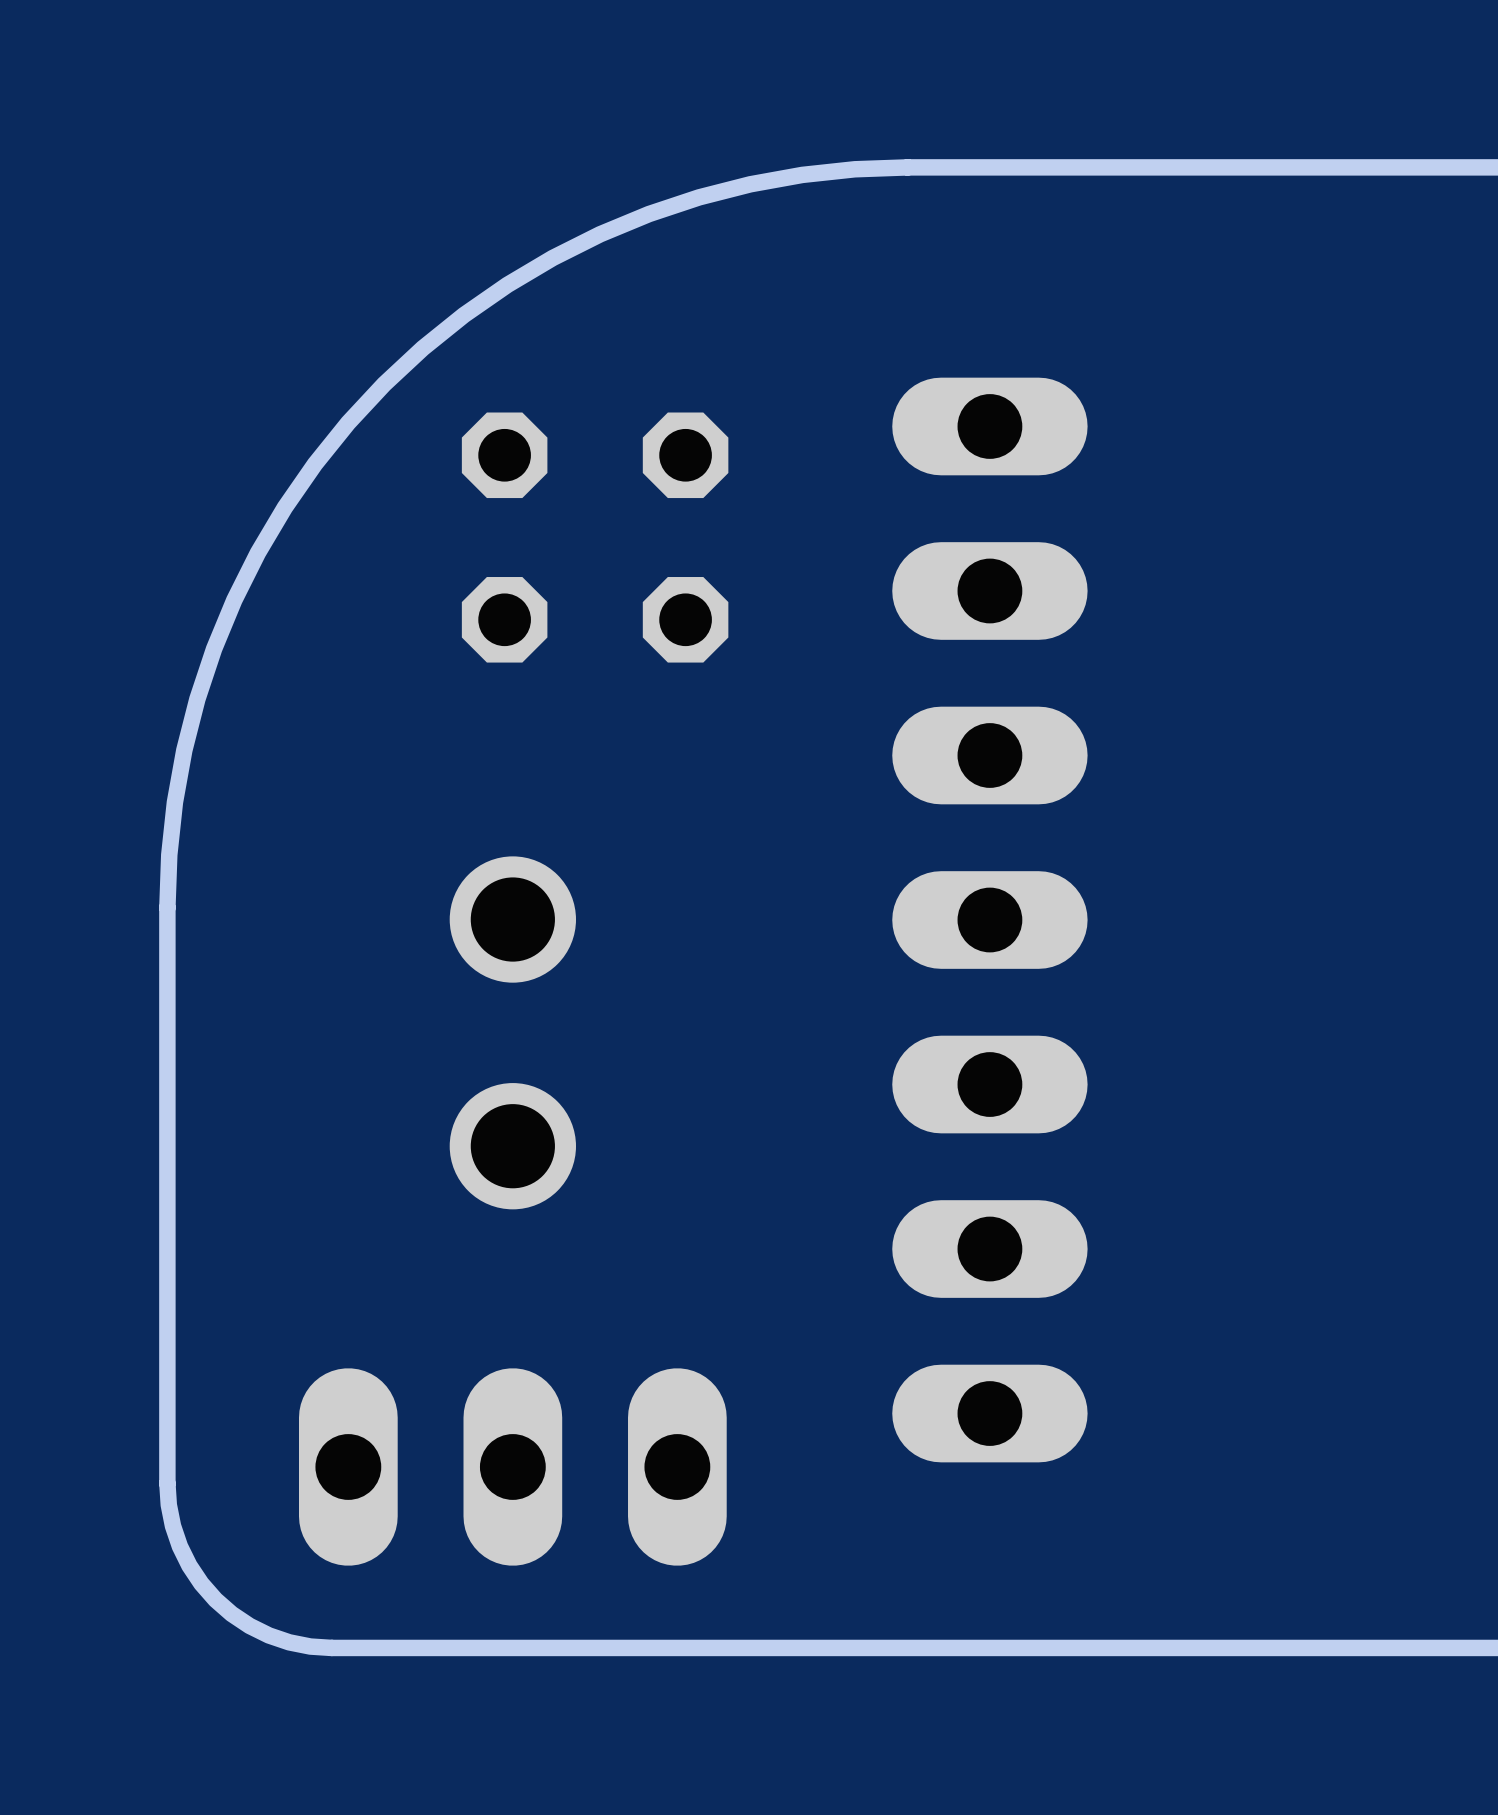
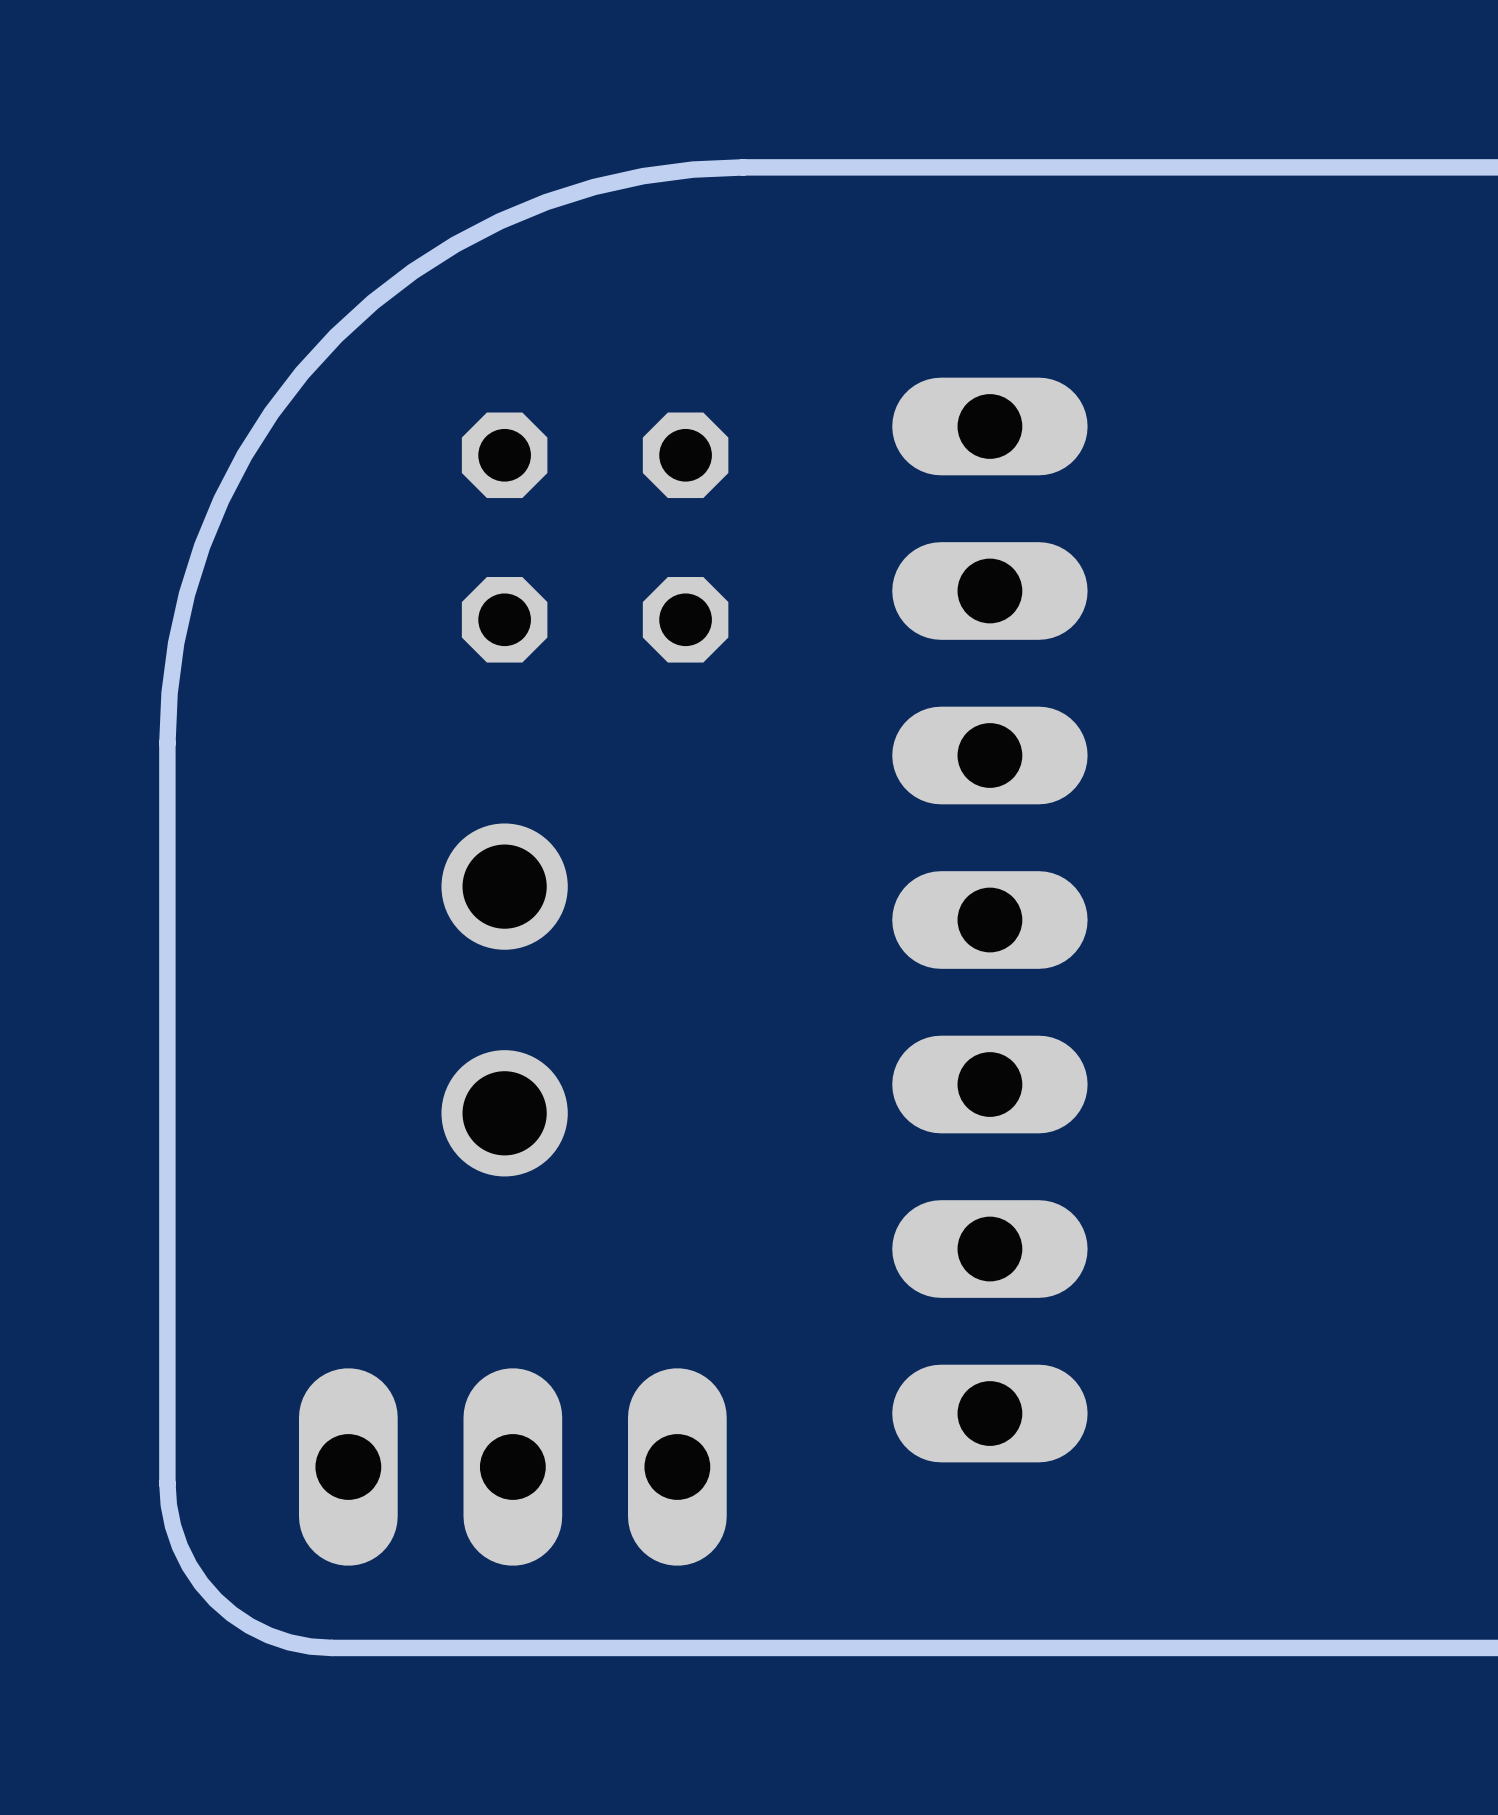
board edge: (907, 167) (854, 169) (802, 174) (750, 184) (699, 197) (648, 214) (600, 234) (552, 257) (507, 284) (464, 315) (422, 348) (384, 384) (348, 422) (315, 464) (284, 507) (257, 552) (234, 600) (214, 648) (197, 699) (184, 750) (174, 802) (169, 854) (167, 907) -> (907, 167) (743, 167) (692, 169) (643, 176) (594, 187) (546, 202) (499, 221) (455, 244) (412, 271) (373, 302) (336, 336) (302, 373) (271, 412) (244, 455) (221, 499) (202, 546) (187, 594) (176, 643) (169, 692) (167, 743) (167, 907)
part position: (512, 1032) -> (504, 999)

